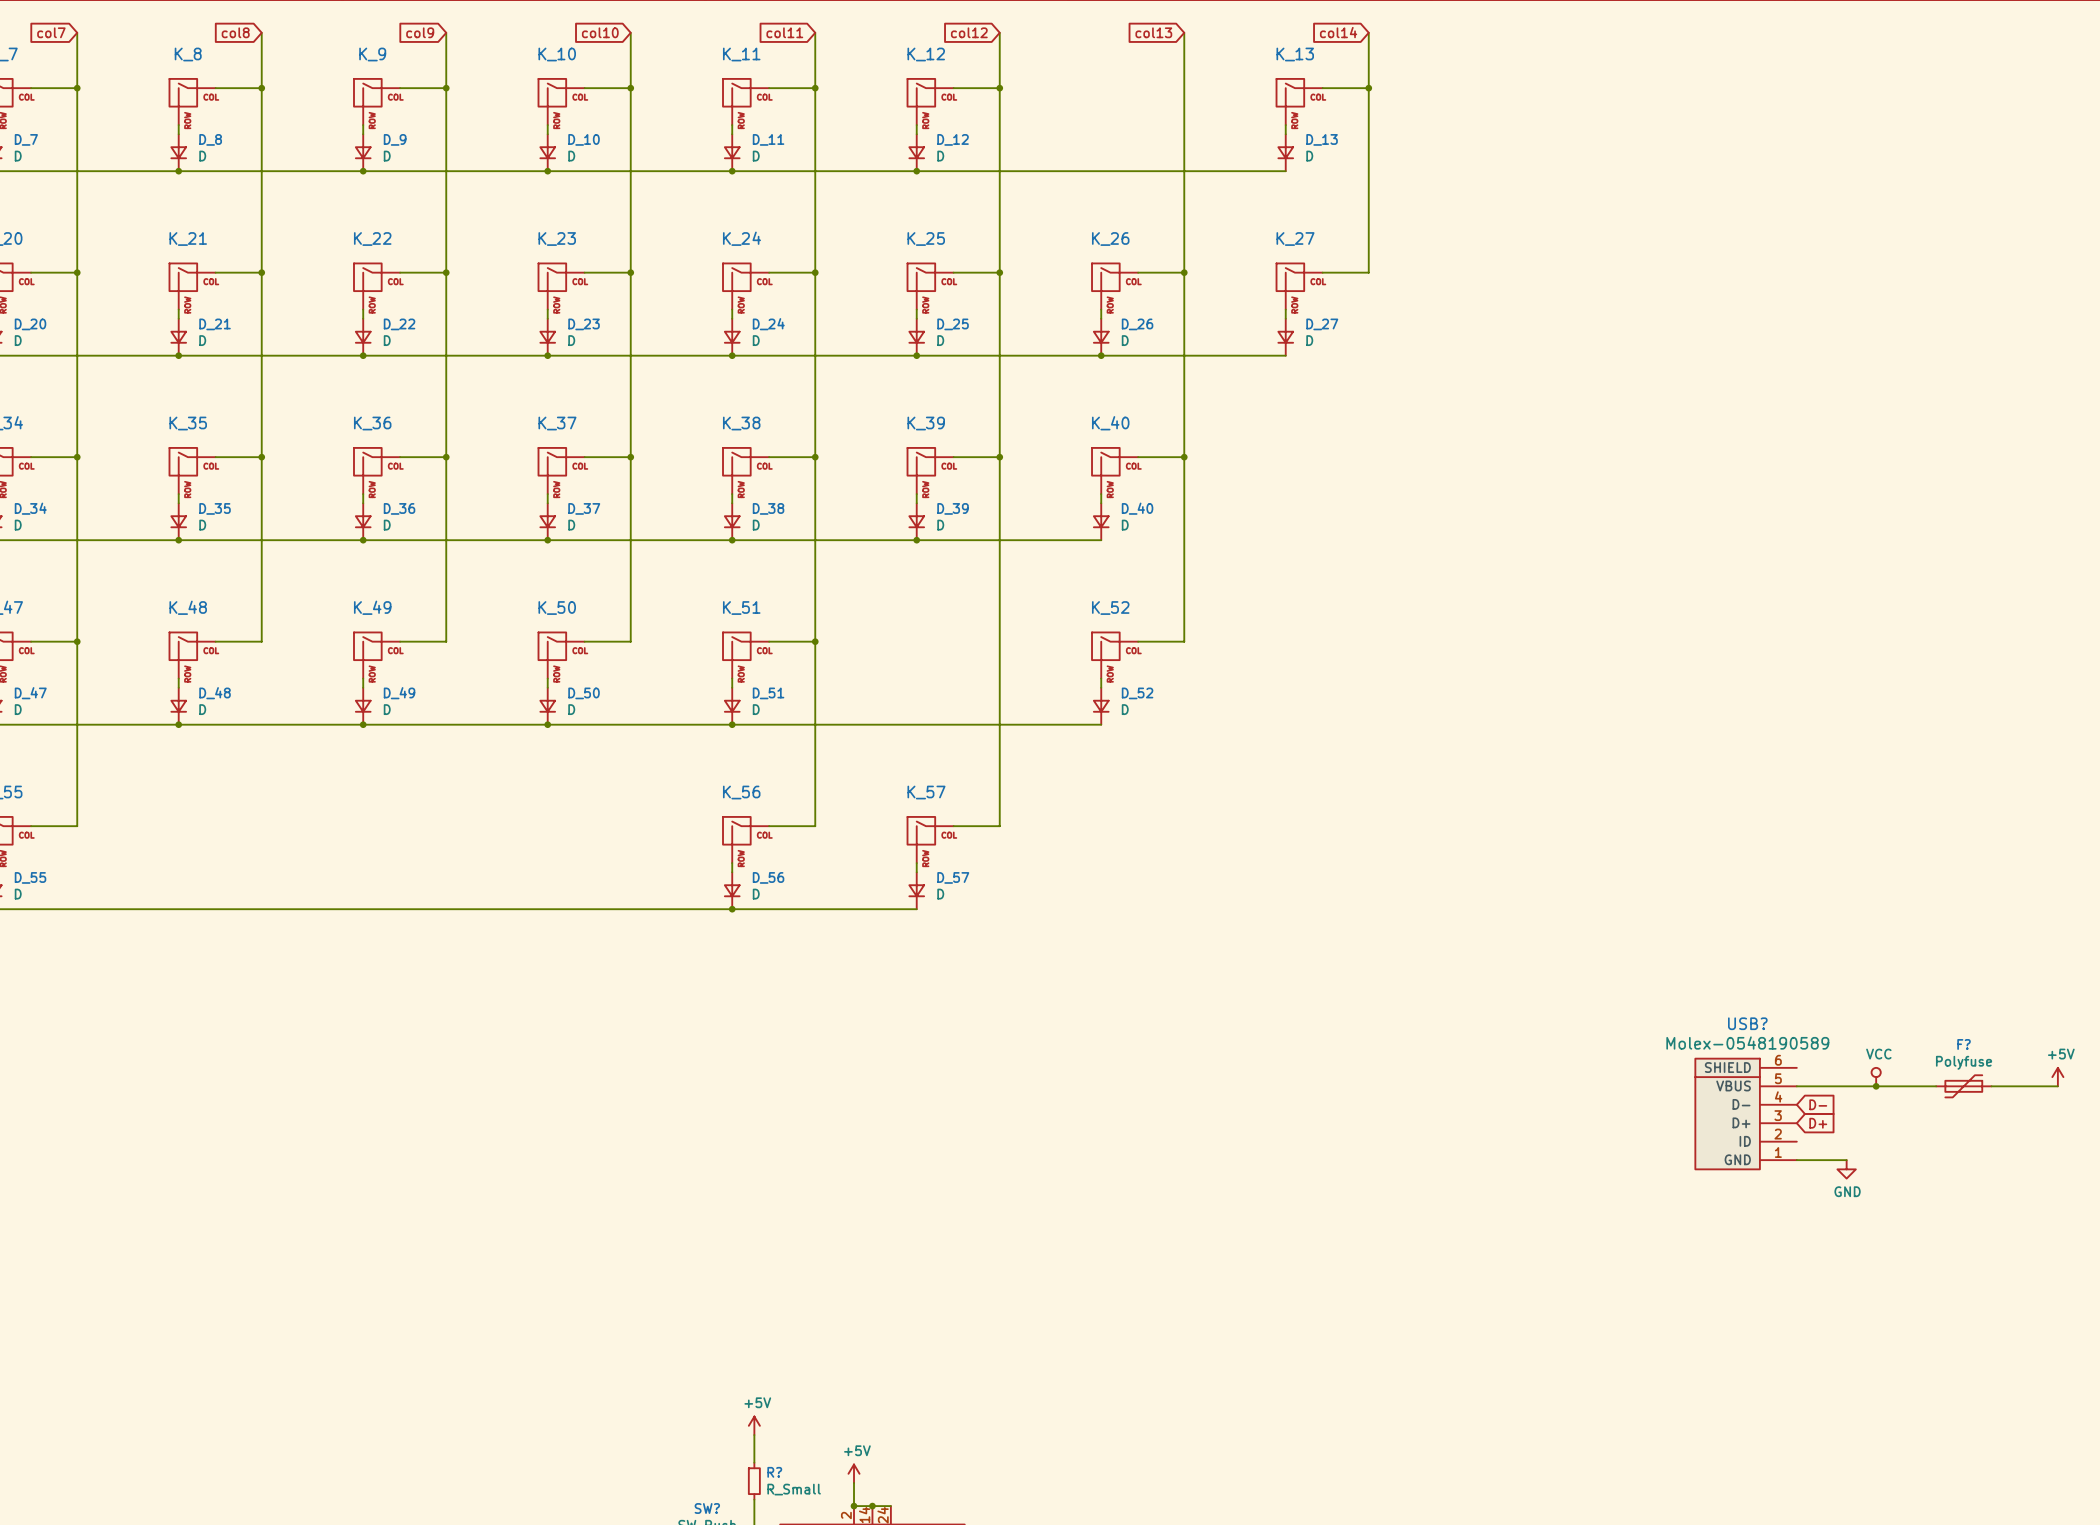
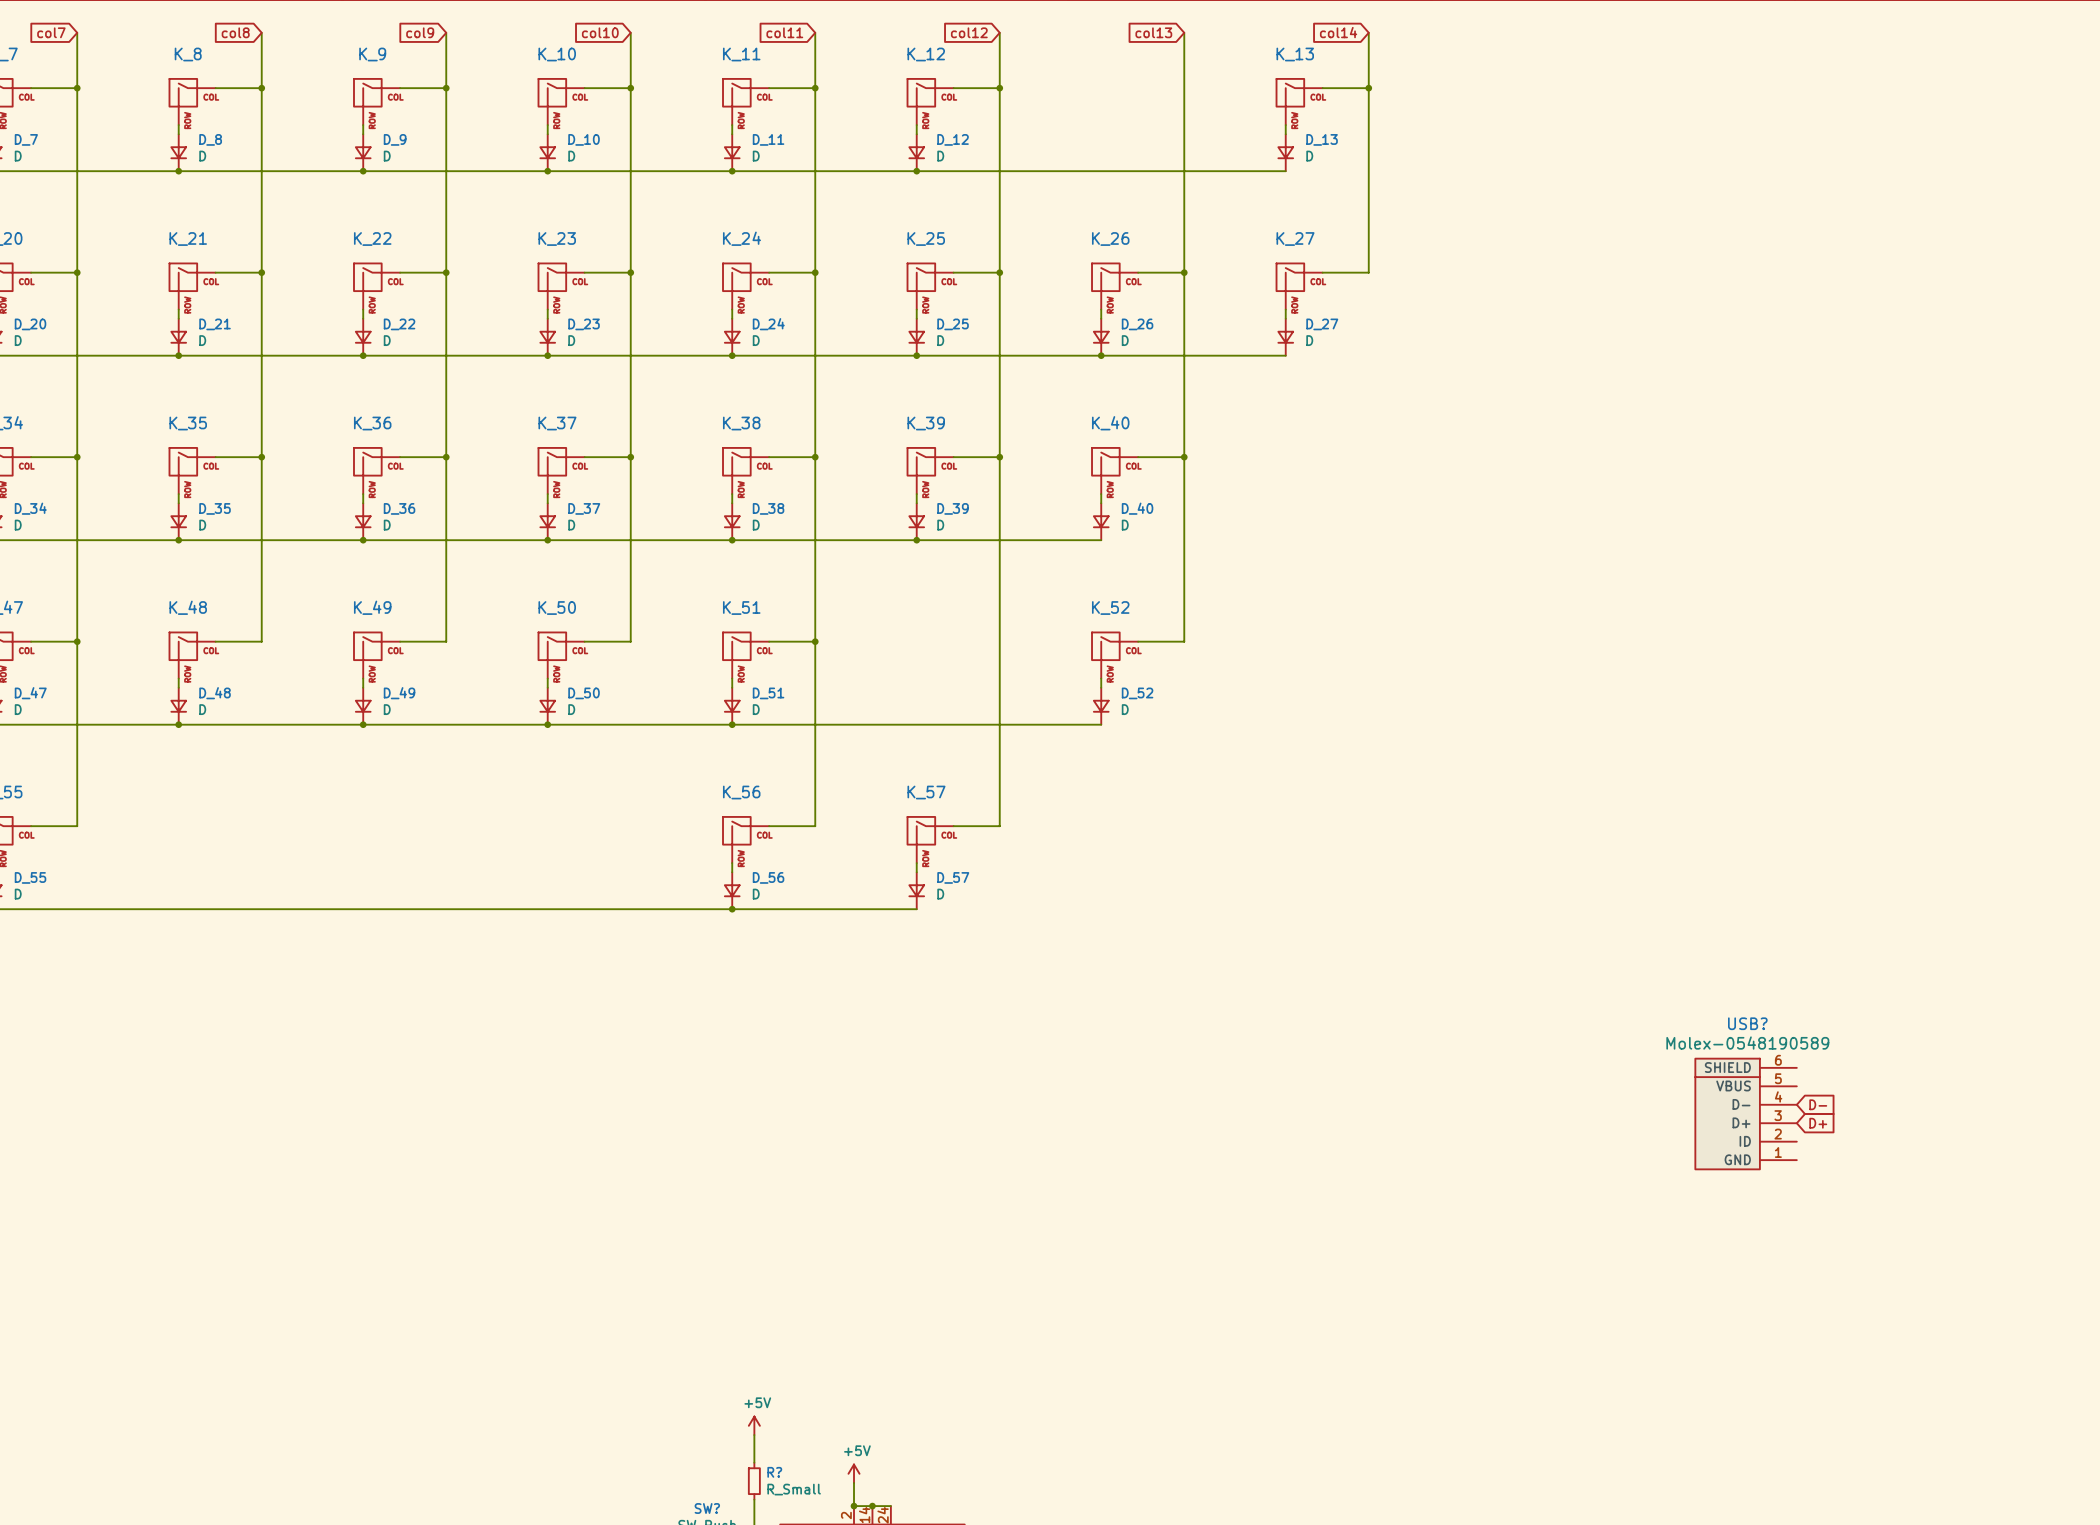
power symbol: VCC (1876, 1077) -> none
power symbol: +5V (2057, 1077) -> none
wire: (1796, 1086) (1936, 1086) -> none
junction: (1876, 1086) -> none
F?: Polyfuse (1963, 1086) -> none
wire: (1991, 1086) (2057, 1086) -> none
wire: (1796, 1160) (1846, 1160) -> none
power symbol: GND (1846, 1169) -> none

